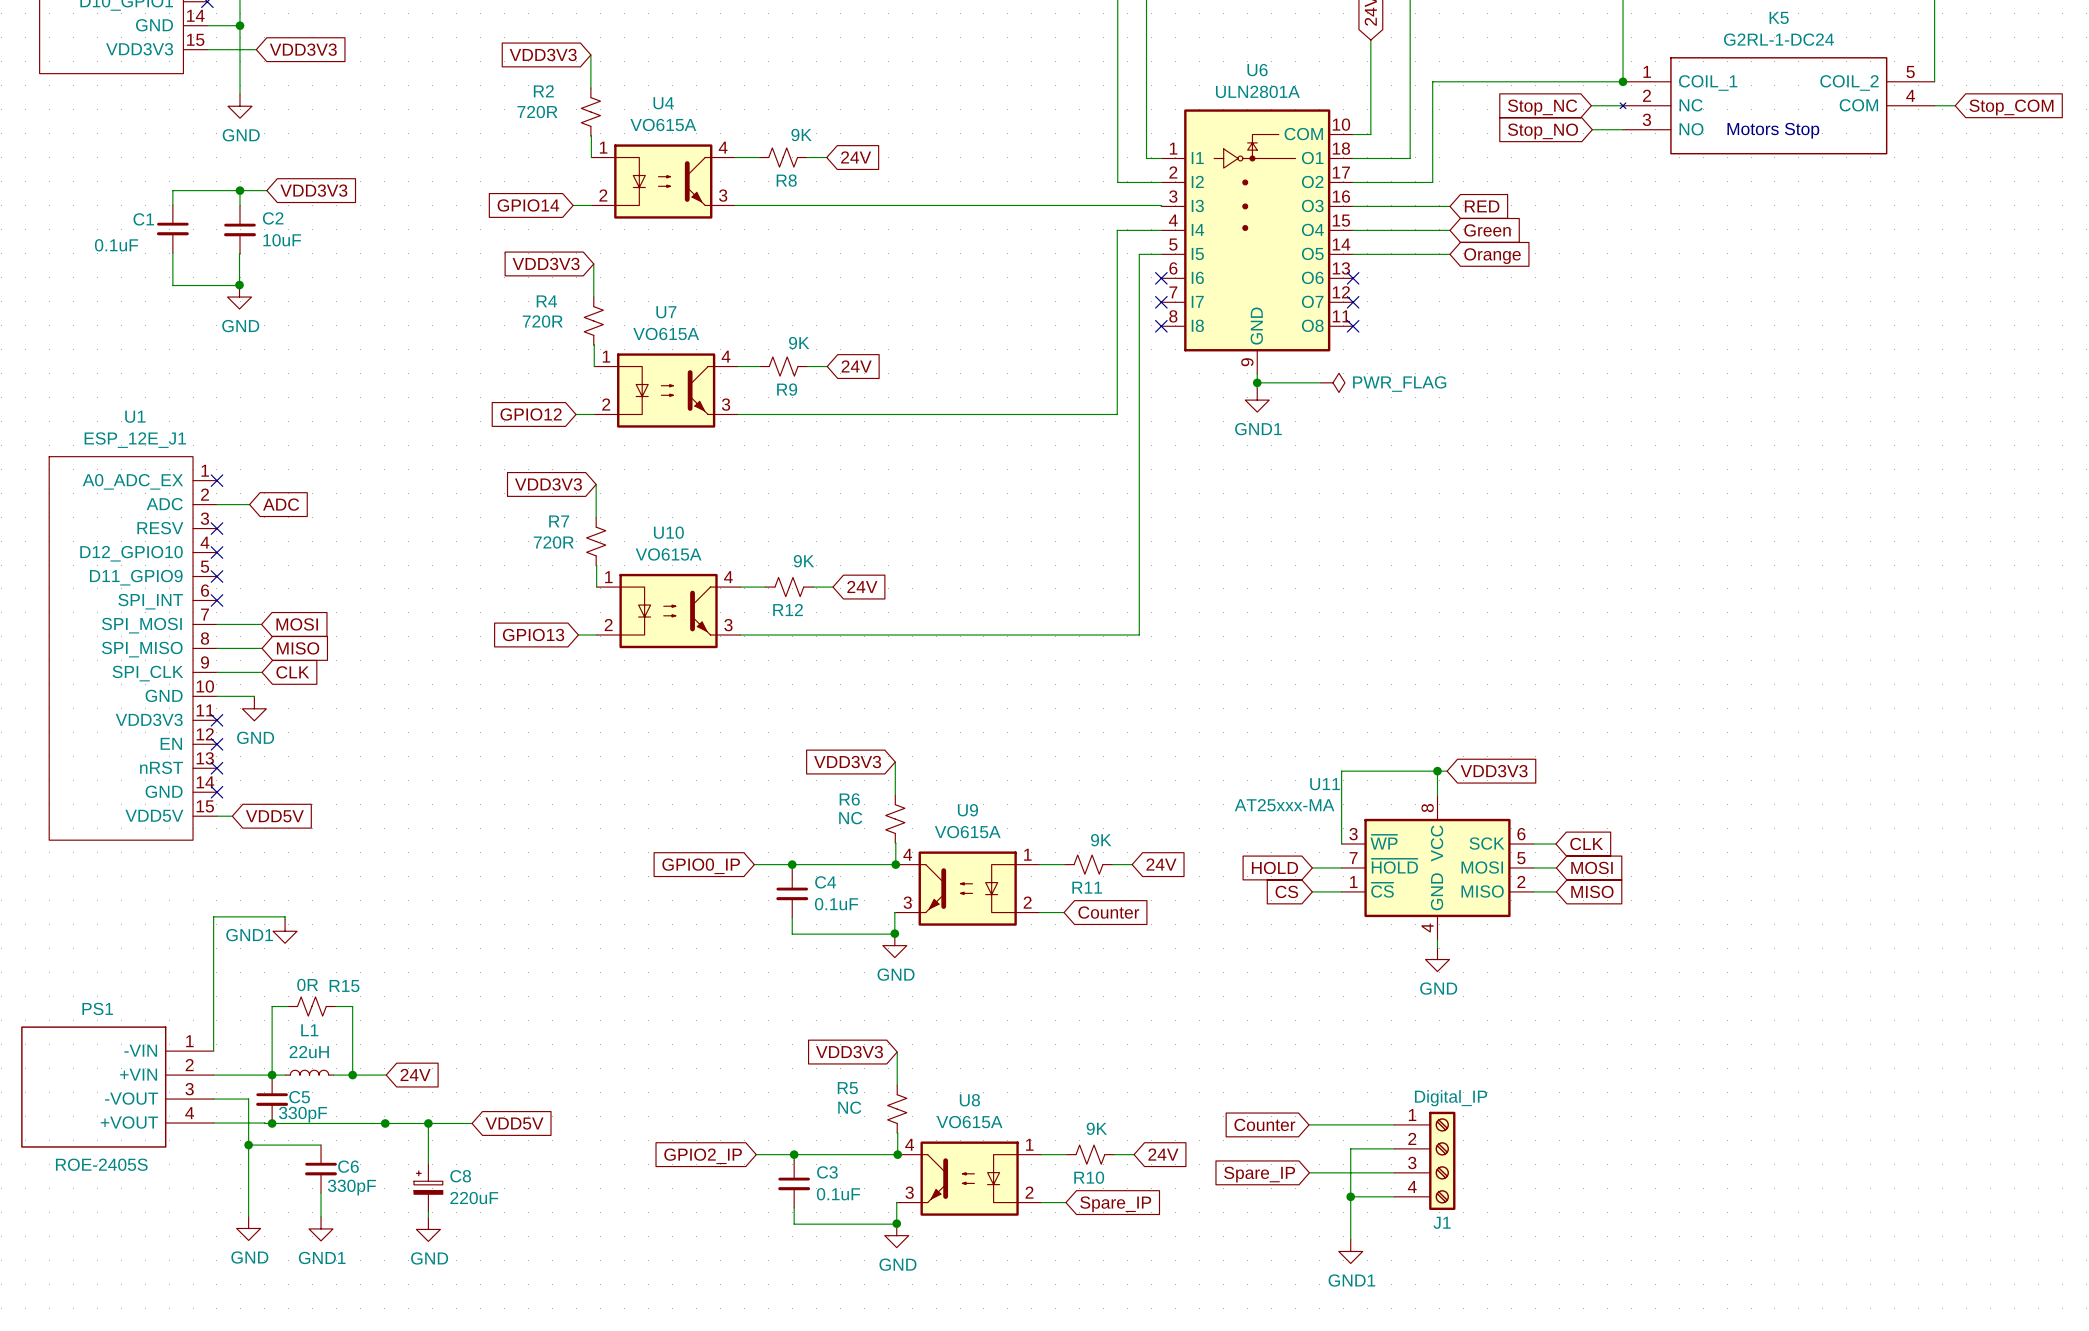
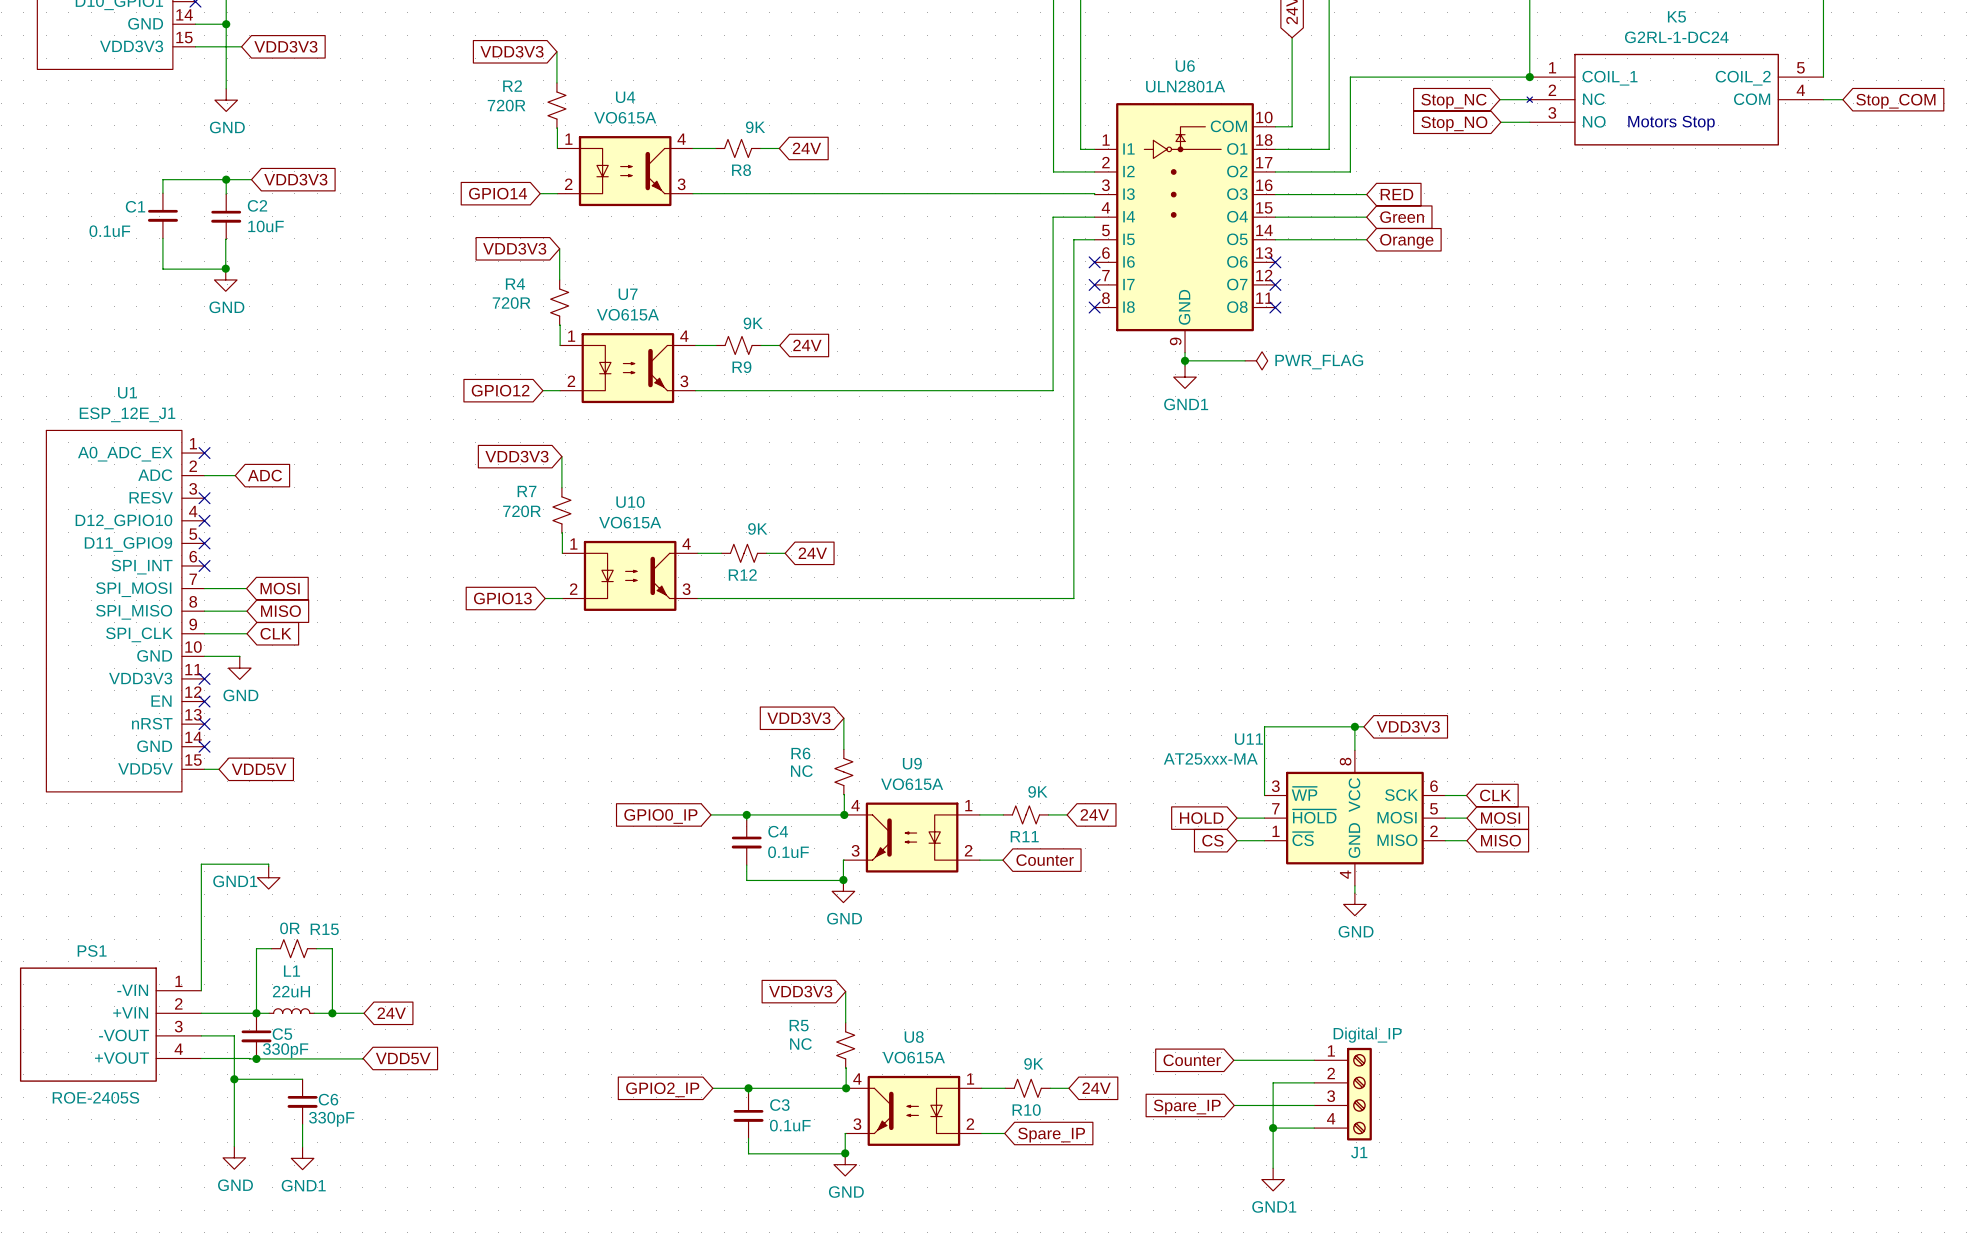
wire: (385, 1123) (472, 1123) -> none
junction: (385, 1123) -> none
wire: (428, 1123) (428, 1163) -> none
junction: (428, 1123) -> none
global label position: VDD5V (514, 1123) -> VDD5V (403, 1058)
C8: 220uF (428, 1187) -> none
wire: (428, 1211) (428, 1217) -> none
power symbol: GND (428, 1229) -> none

